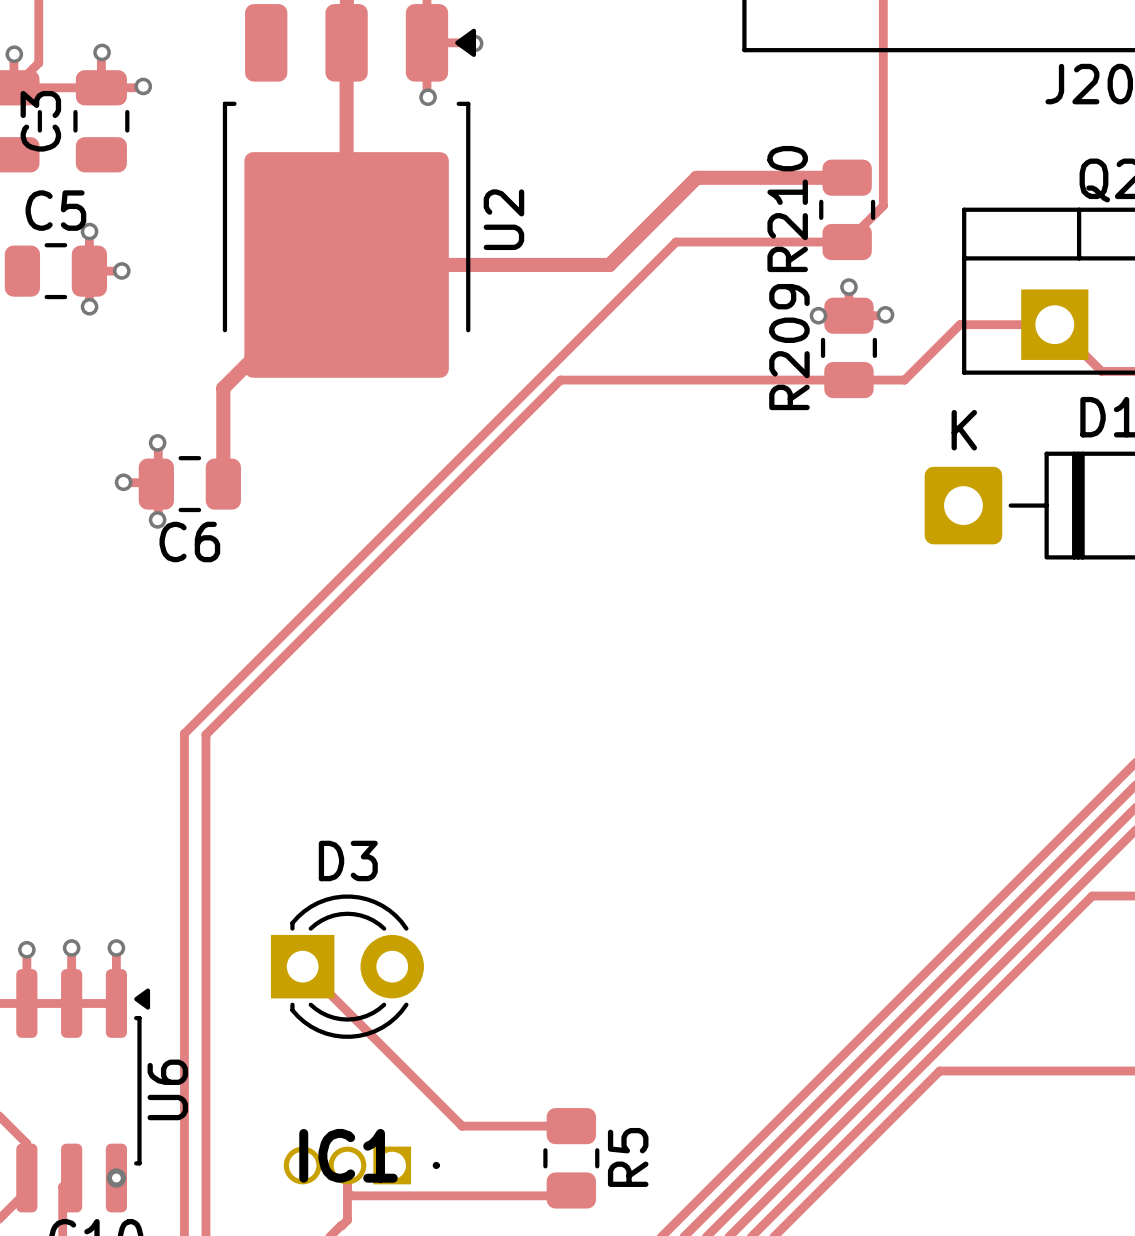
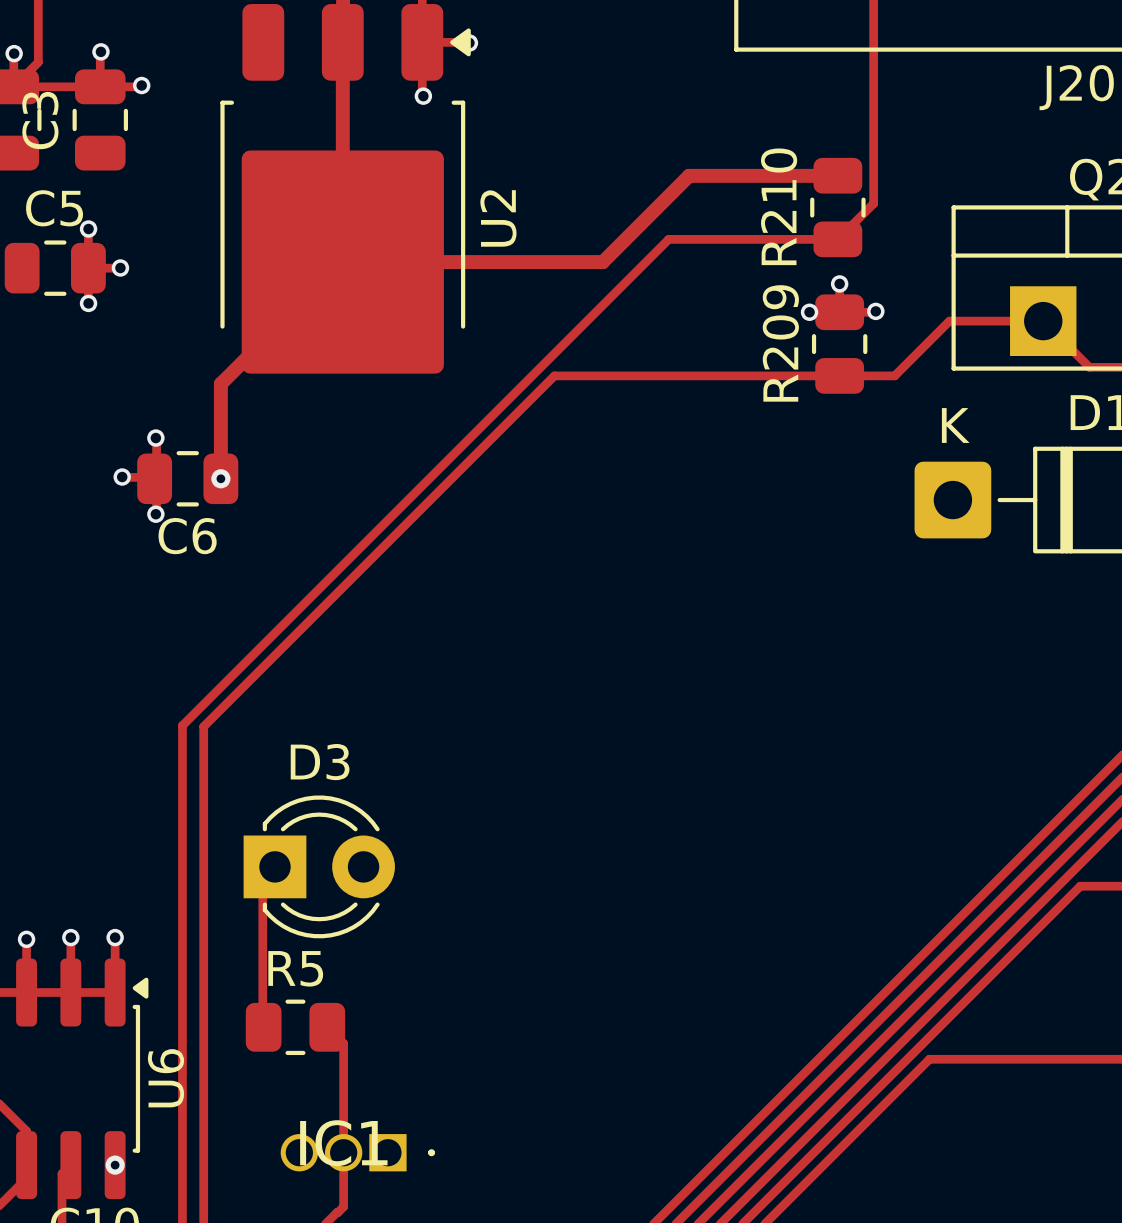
via: none -> (220, 478)
track: none -> (274, 866) (262, 879) (263, 1027)
track: (302, 966) (462, 1126) (571, 1126) -> none
D3 position: (347, 966) -> (319, 866)
track: none -> (327, 1027) (343, 1043) (343, 1152)
R5 name position: R5 (628, 1157) -> R5 (295, 968)
R5 rotation: 0° (571, 1158) -> 90° clockwise (295, 1027)
R5 position: (571, 1158) -> (295, 1027)
track: (571, 1190) (565, 1195) (351, 1195) (347, 1192) -> none

